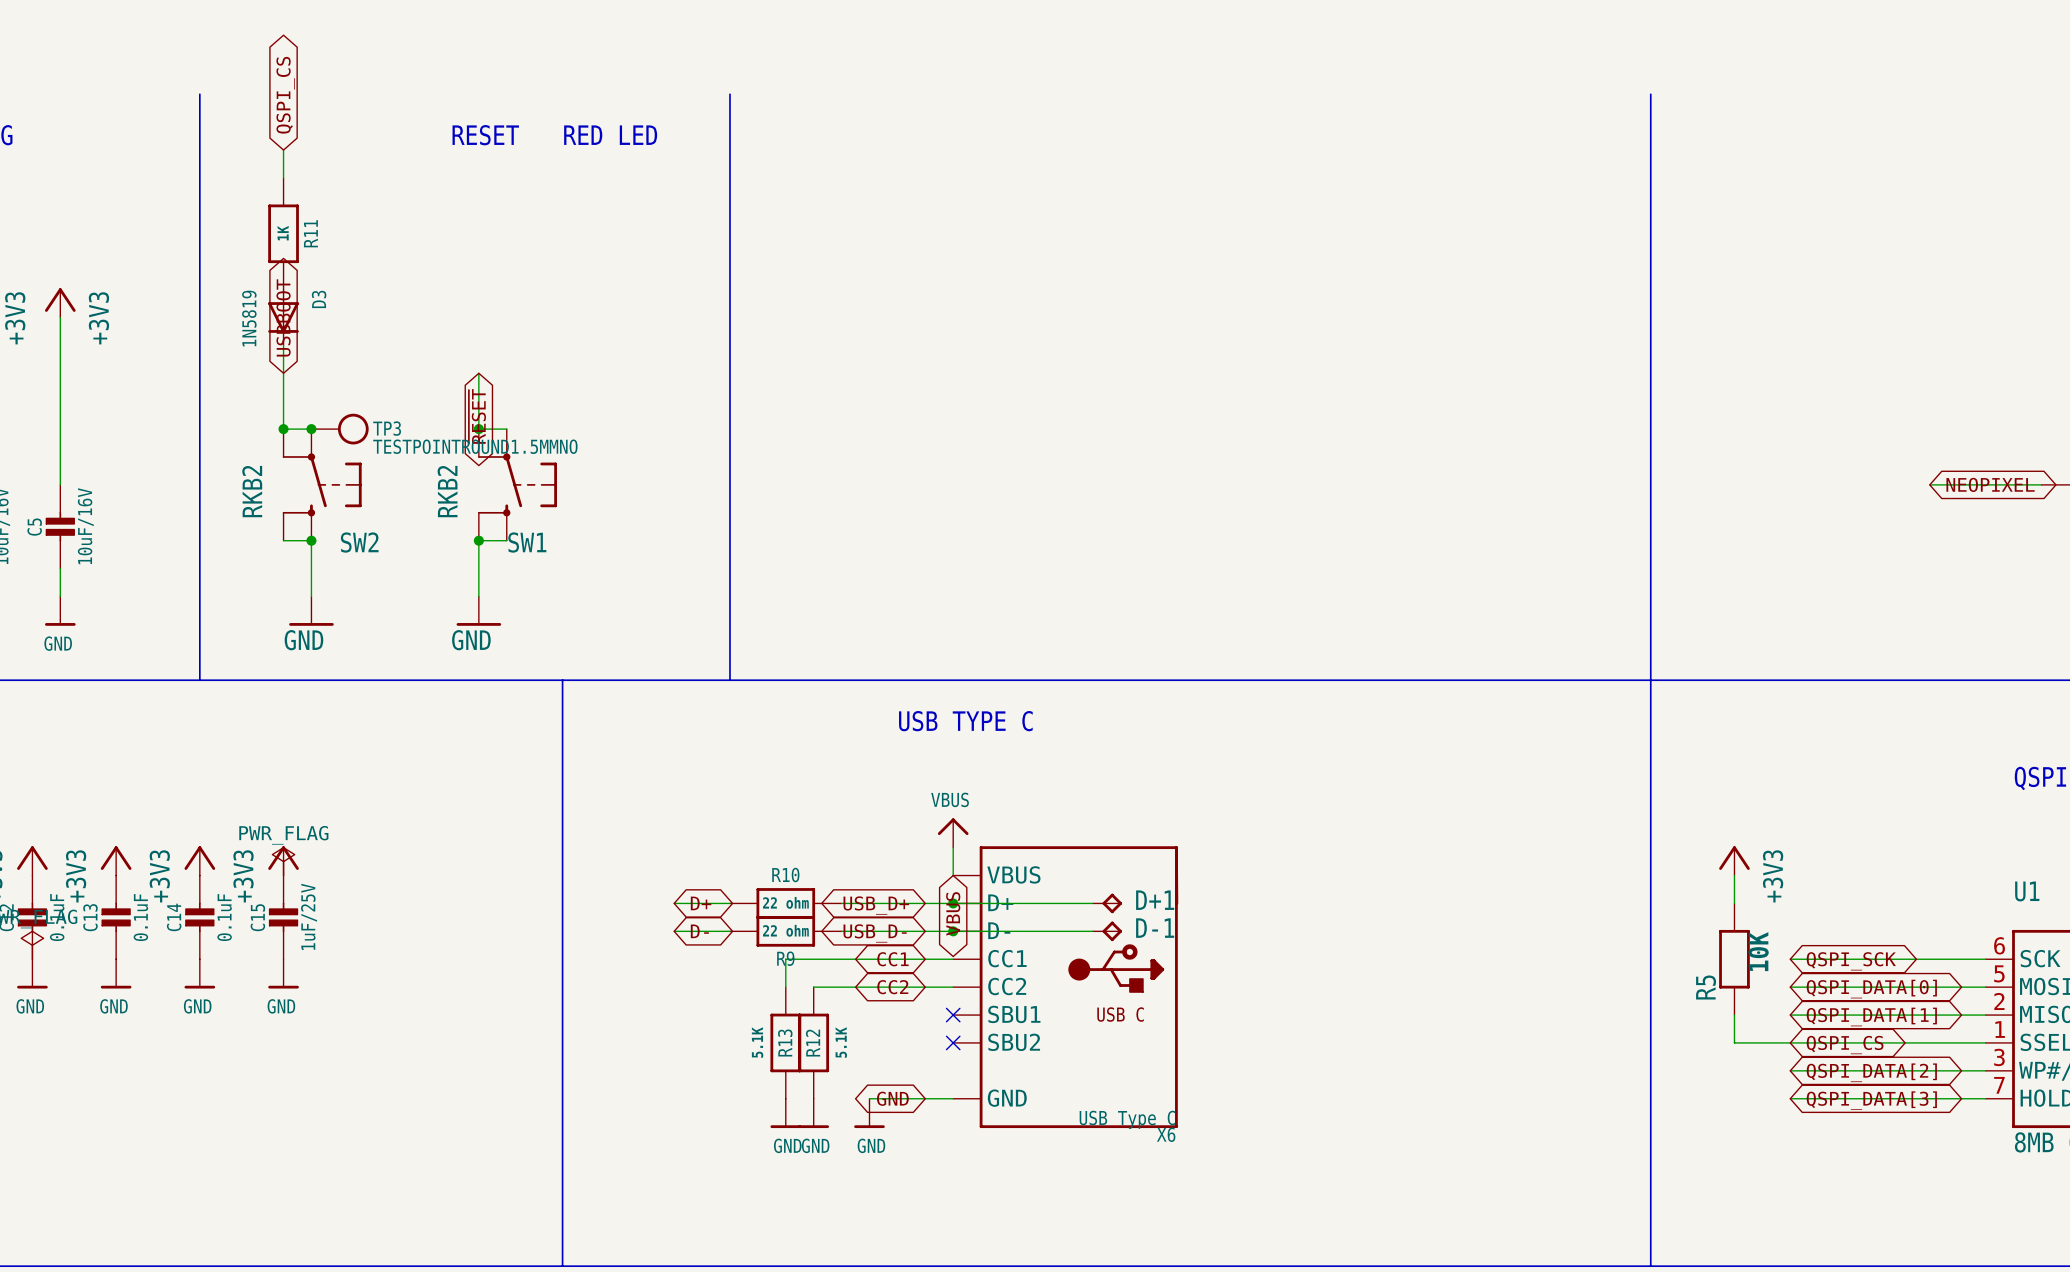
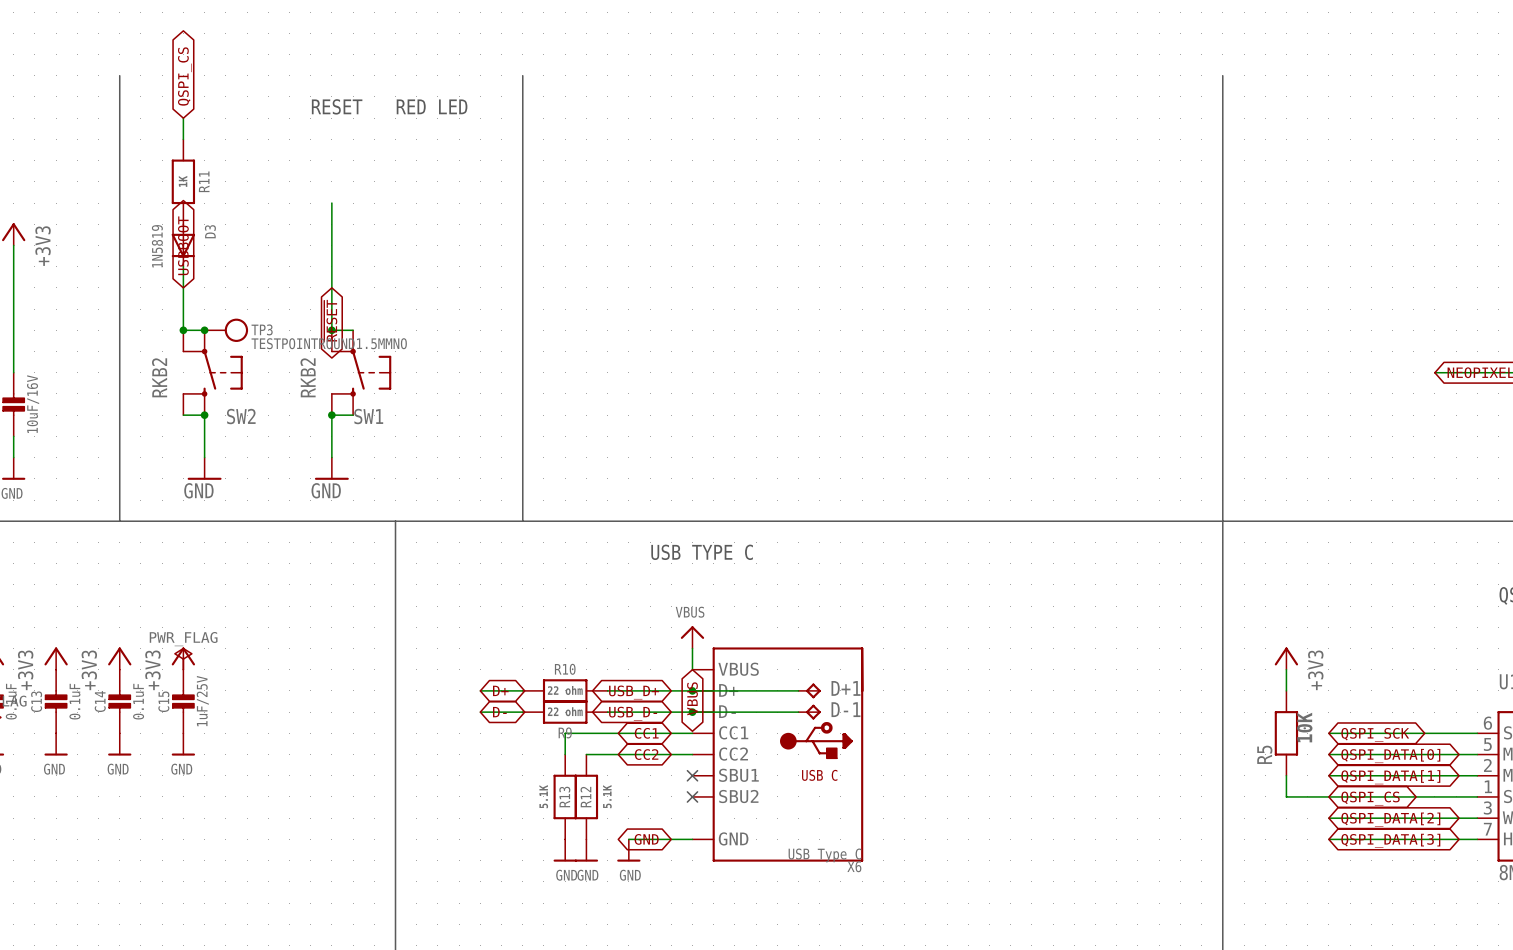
wire: none -> (331, 203) (331, 287)

